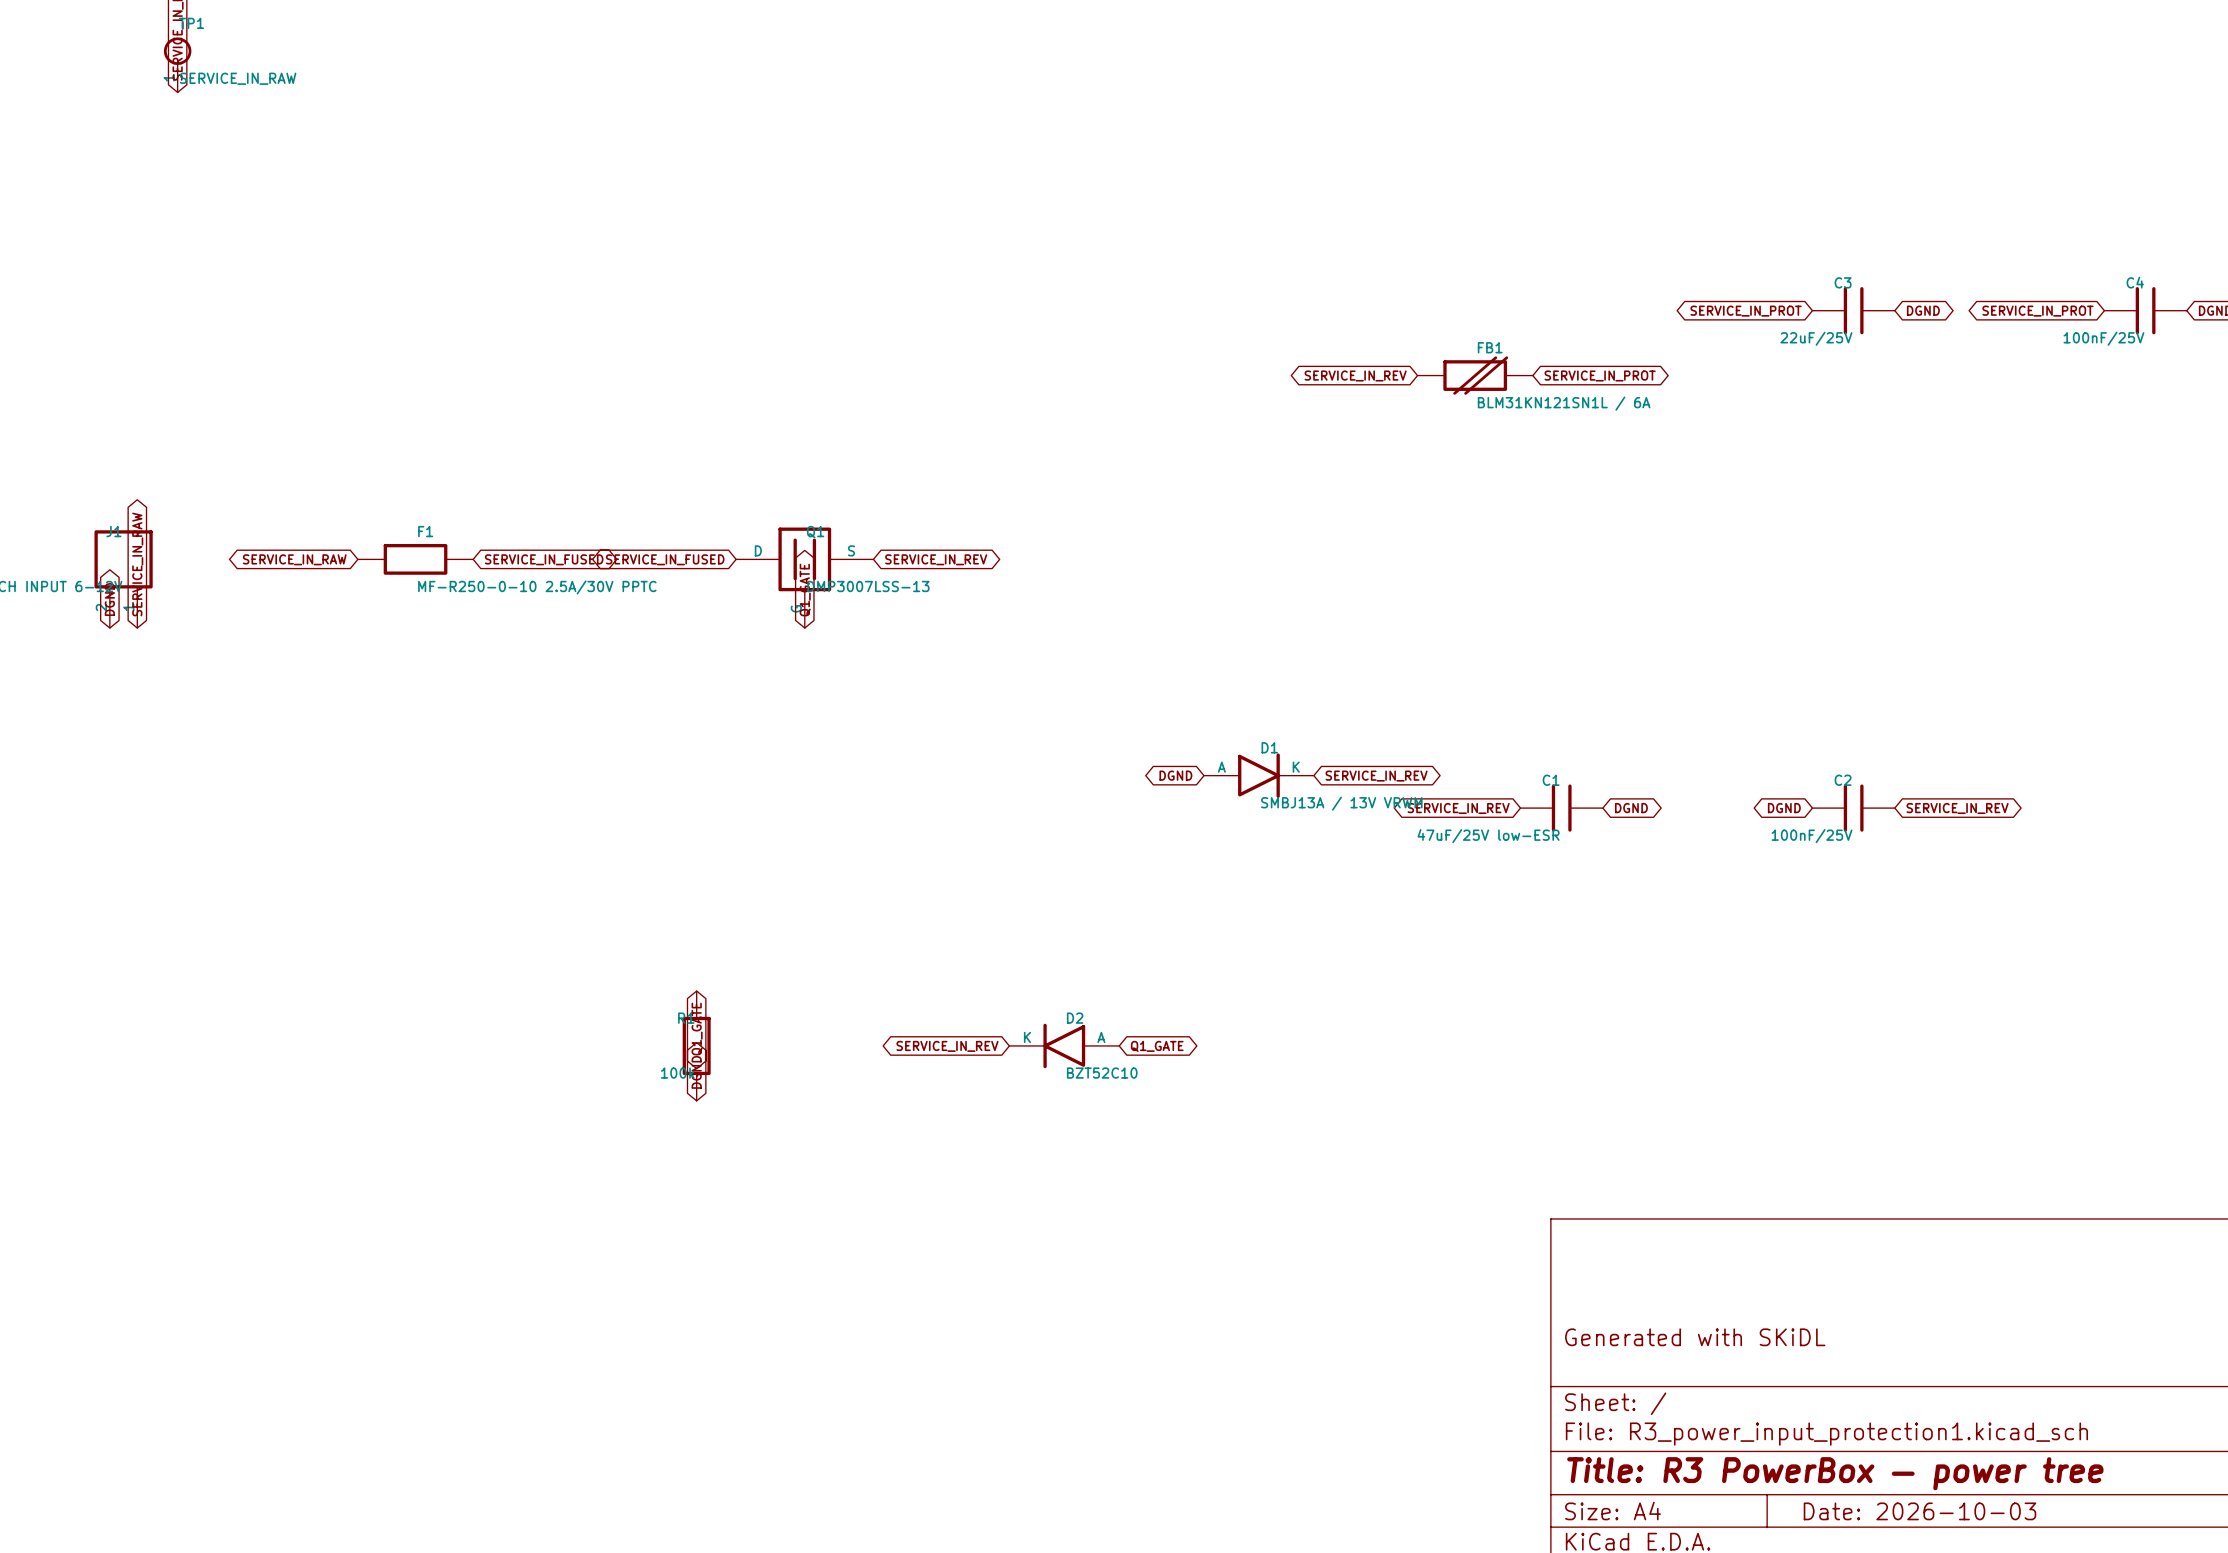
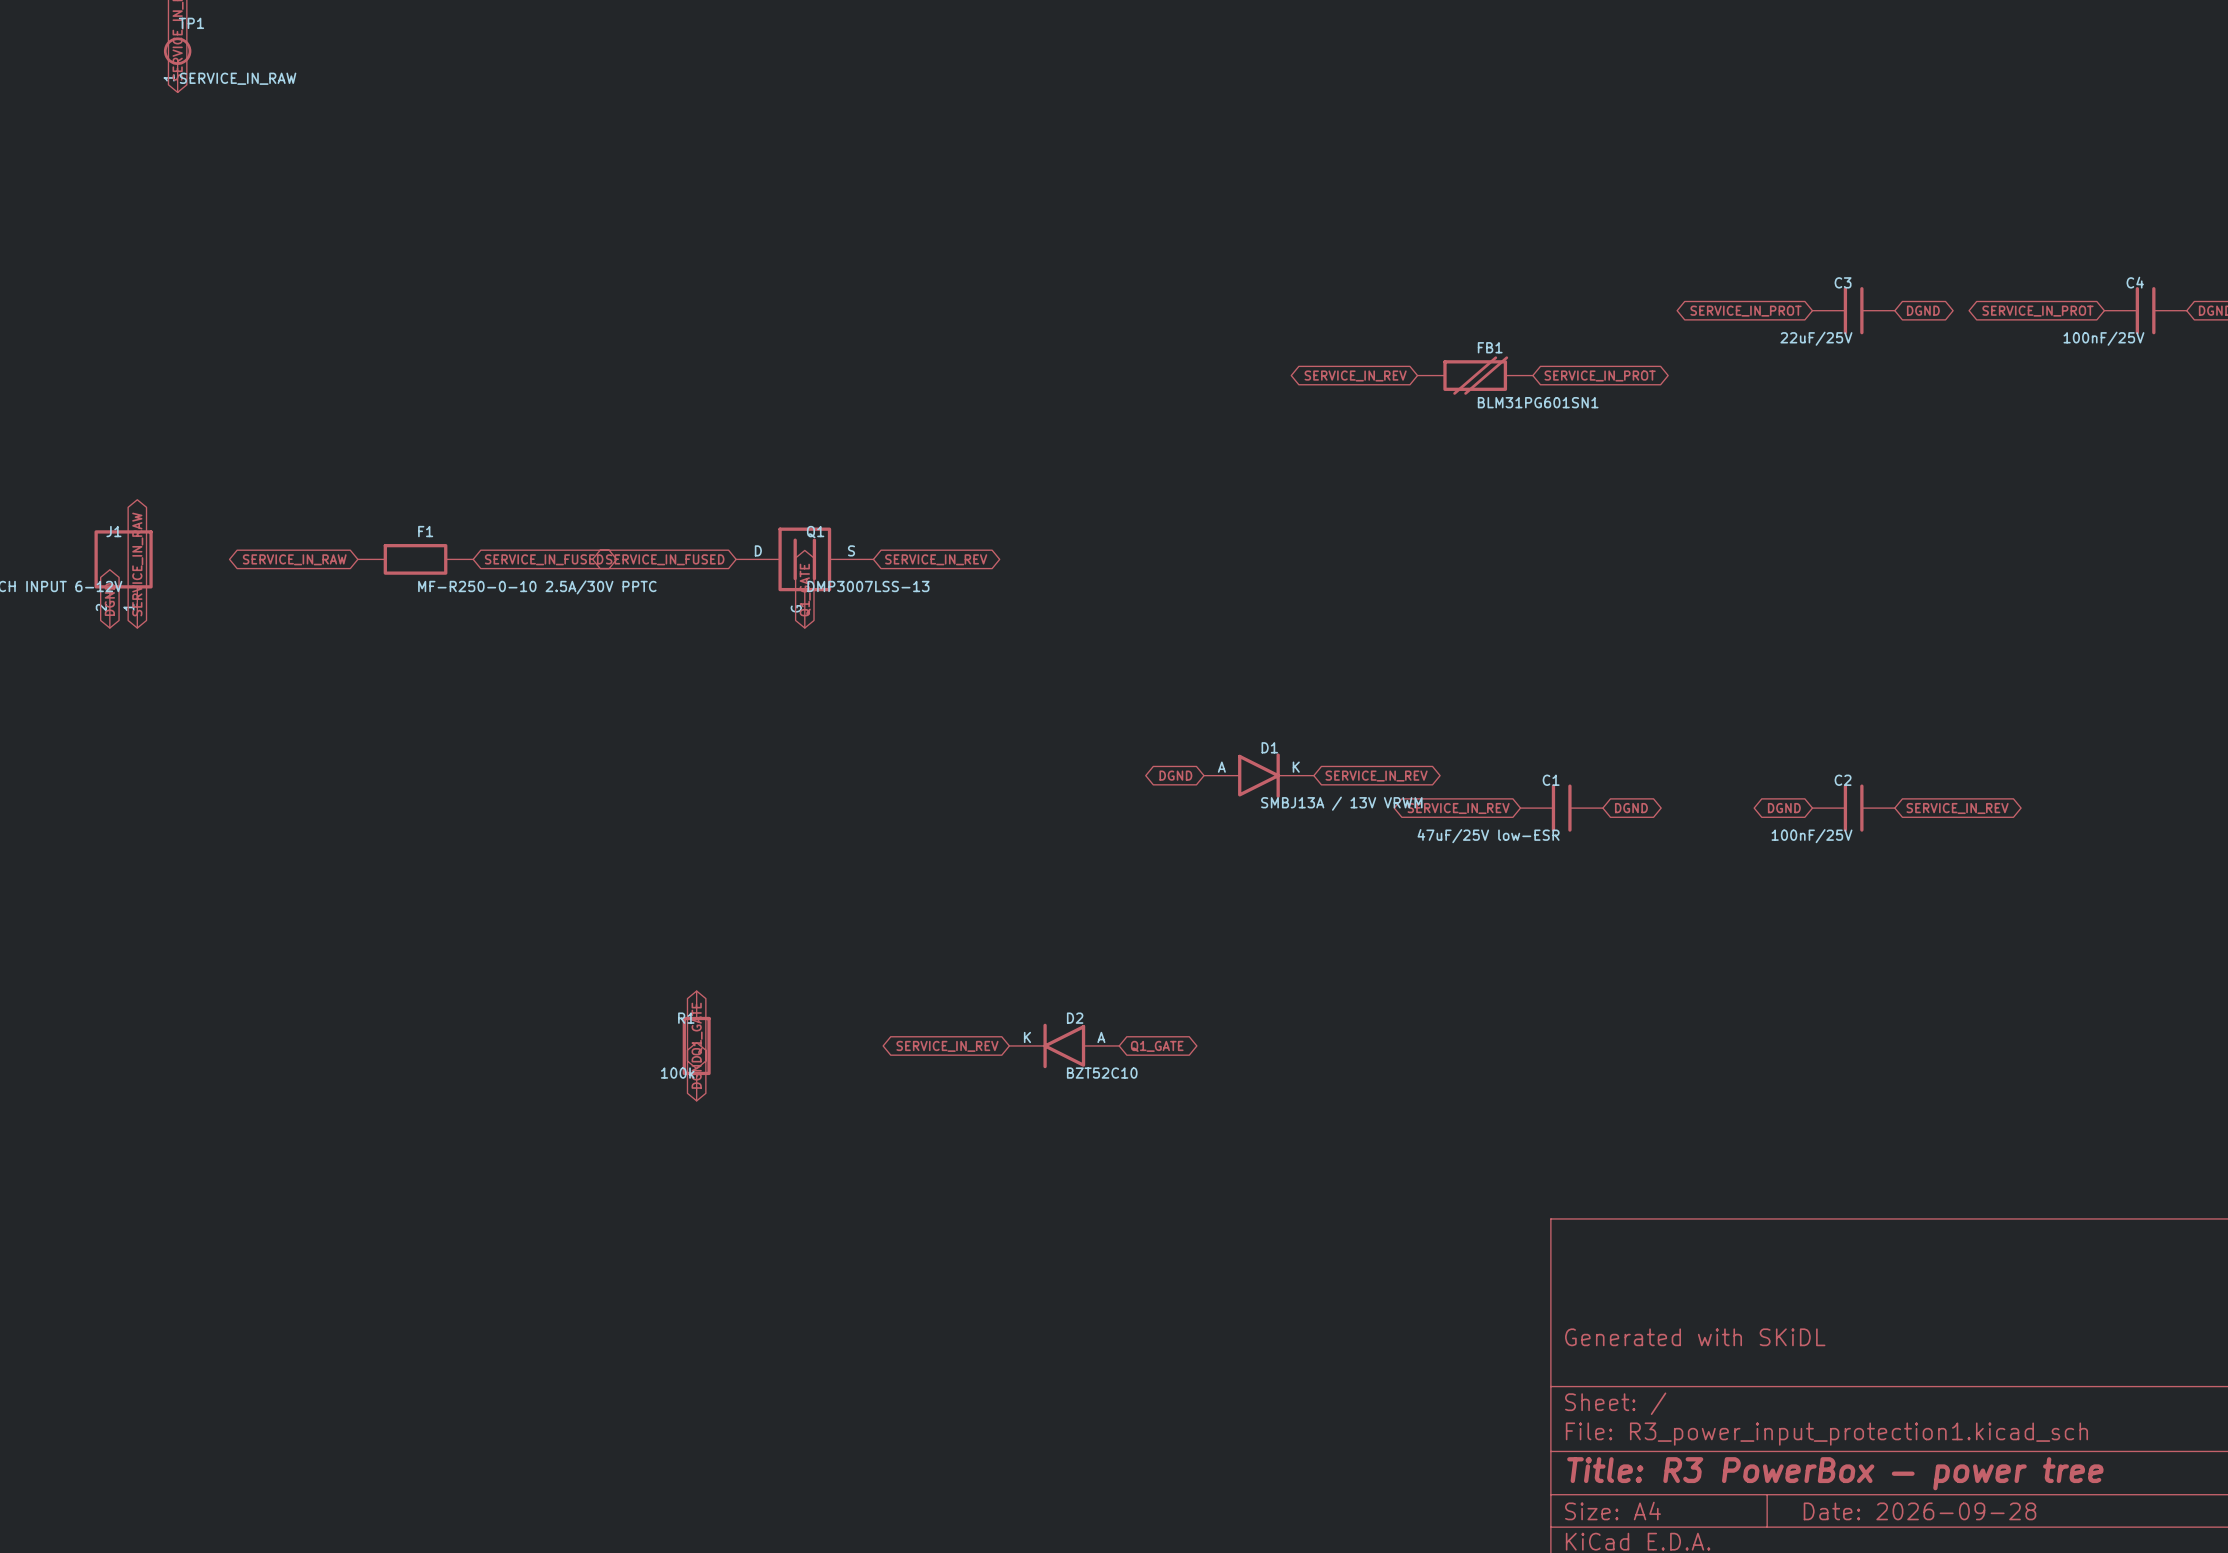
FB1 value: BLM31KN121SN1L / 6A (1564, 403) -> BLM31PG601SN1 (1538, 402)
title block: Date: 2026-10-03 (1919, 1511) -> Date: 2026-09-28 (1919, 1511)

